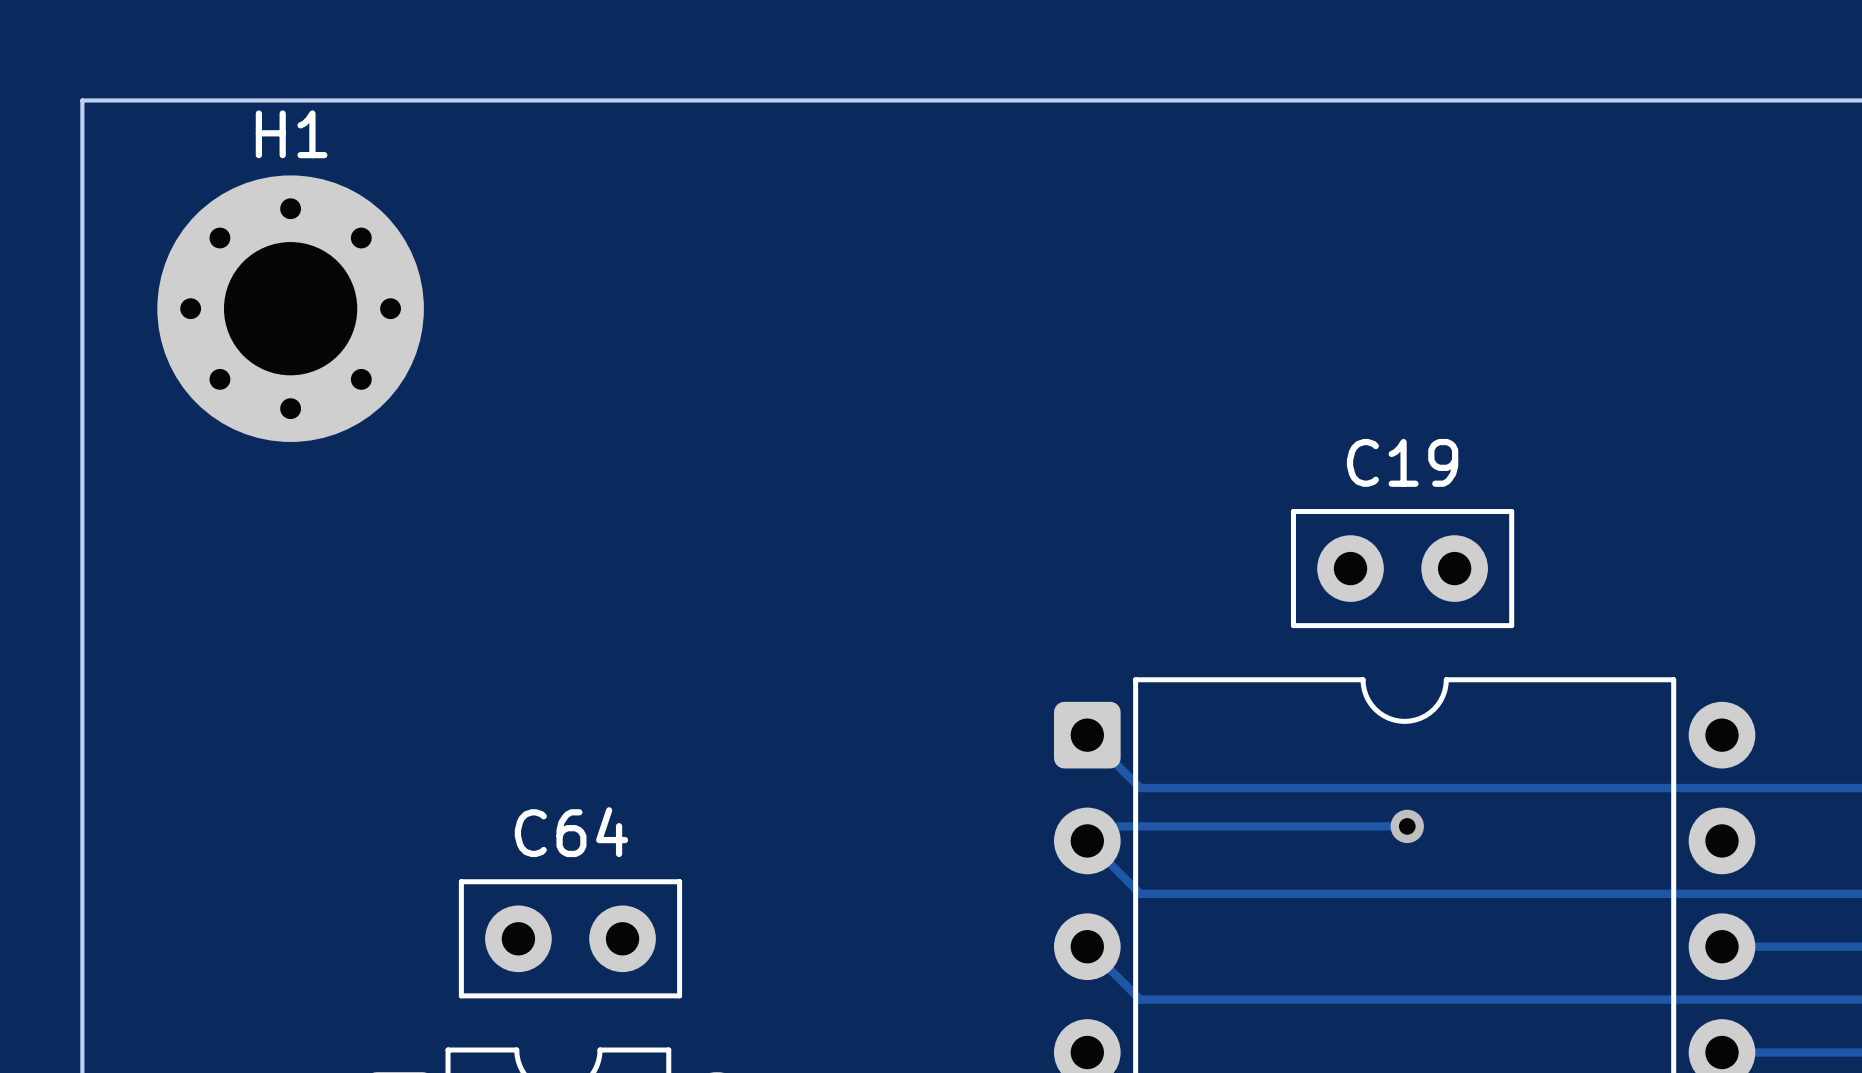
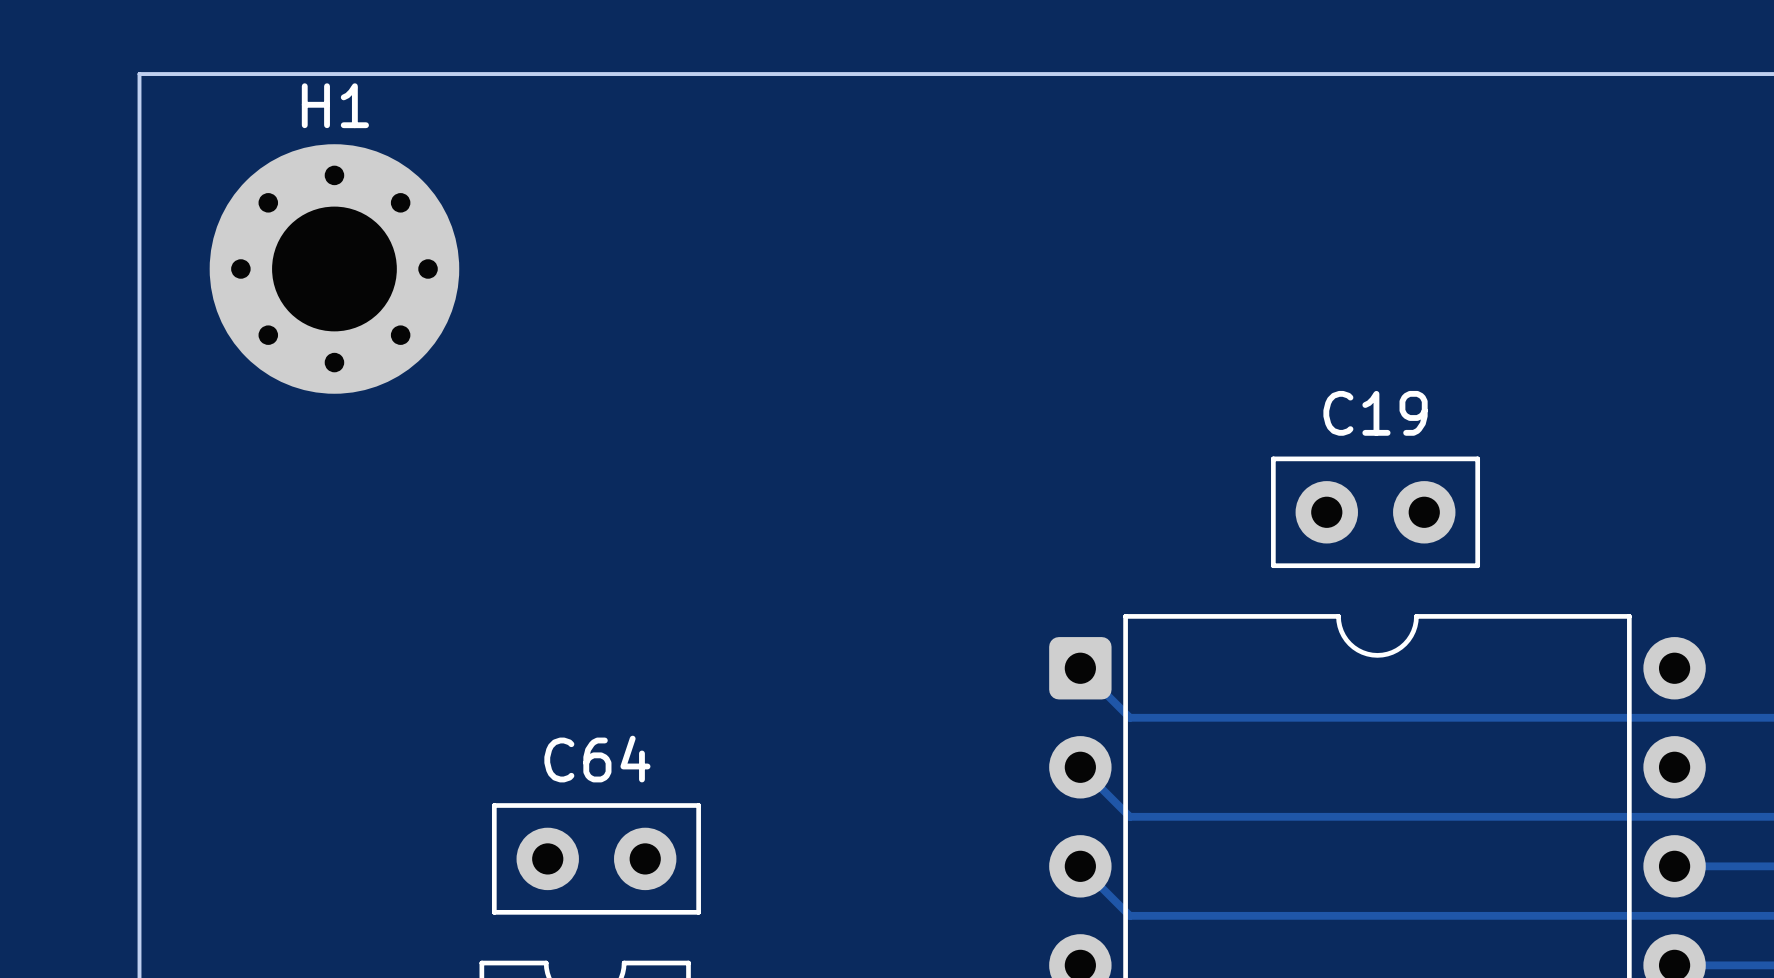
track: (1407, 826) (1101, 826) (1087, 840) -> none
via: (1407, 826) -> none

